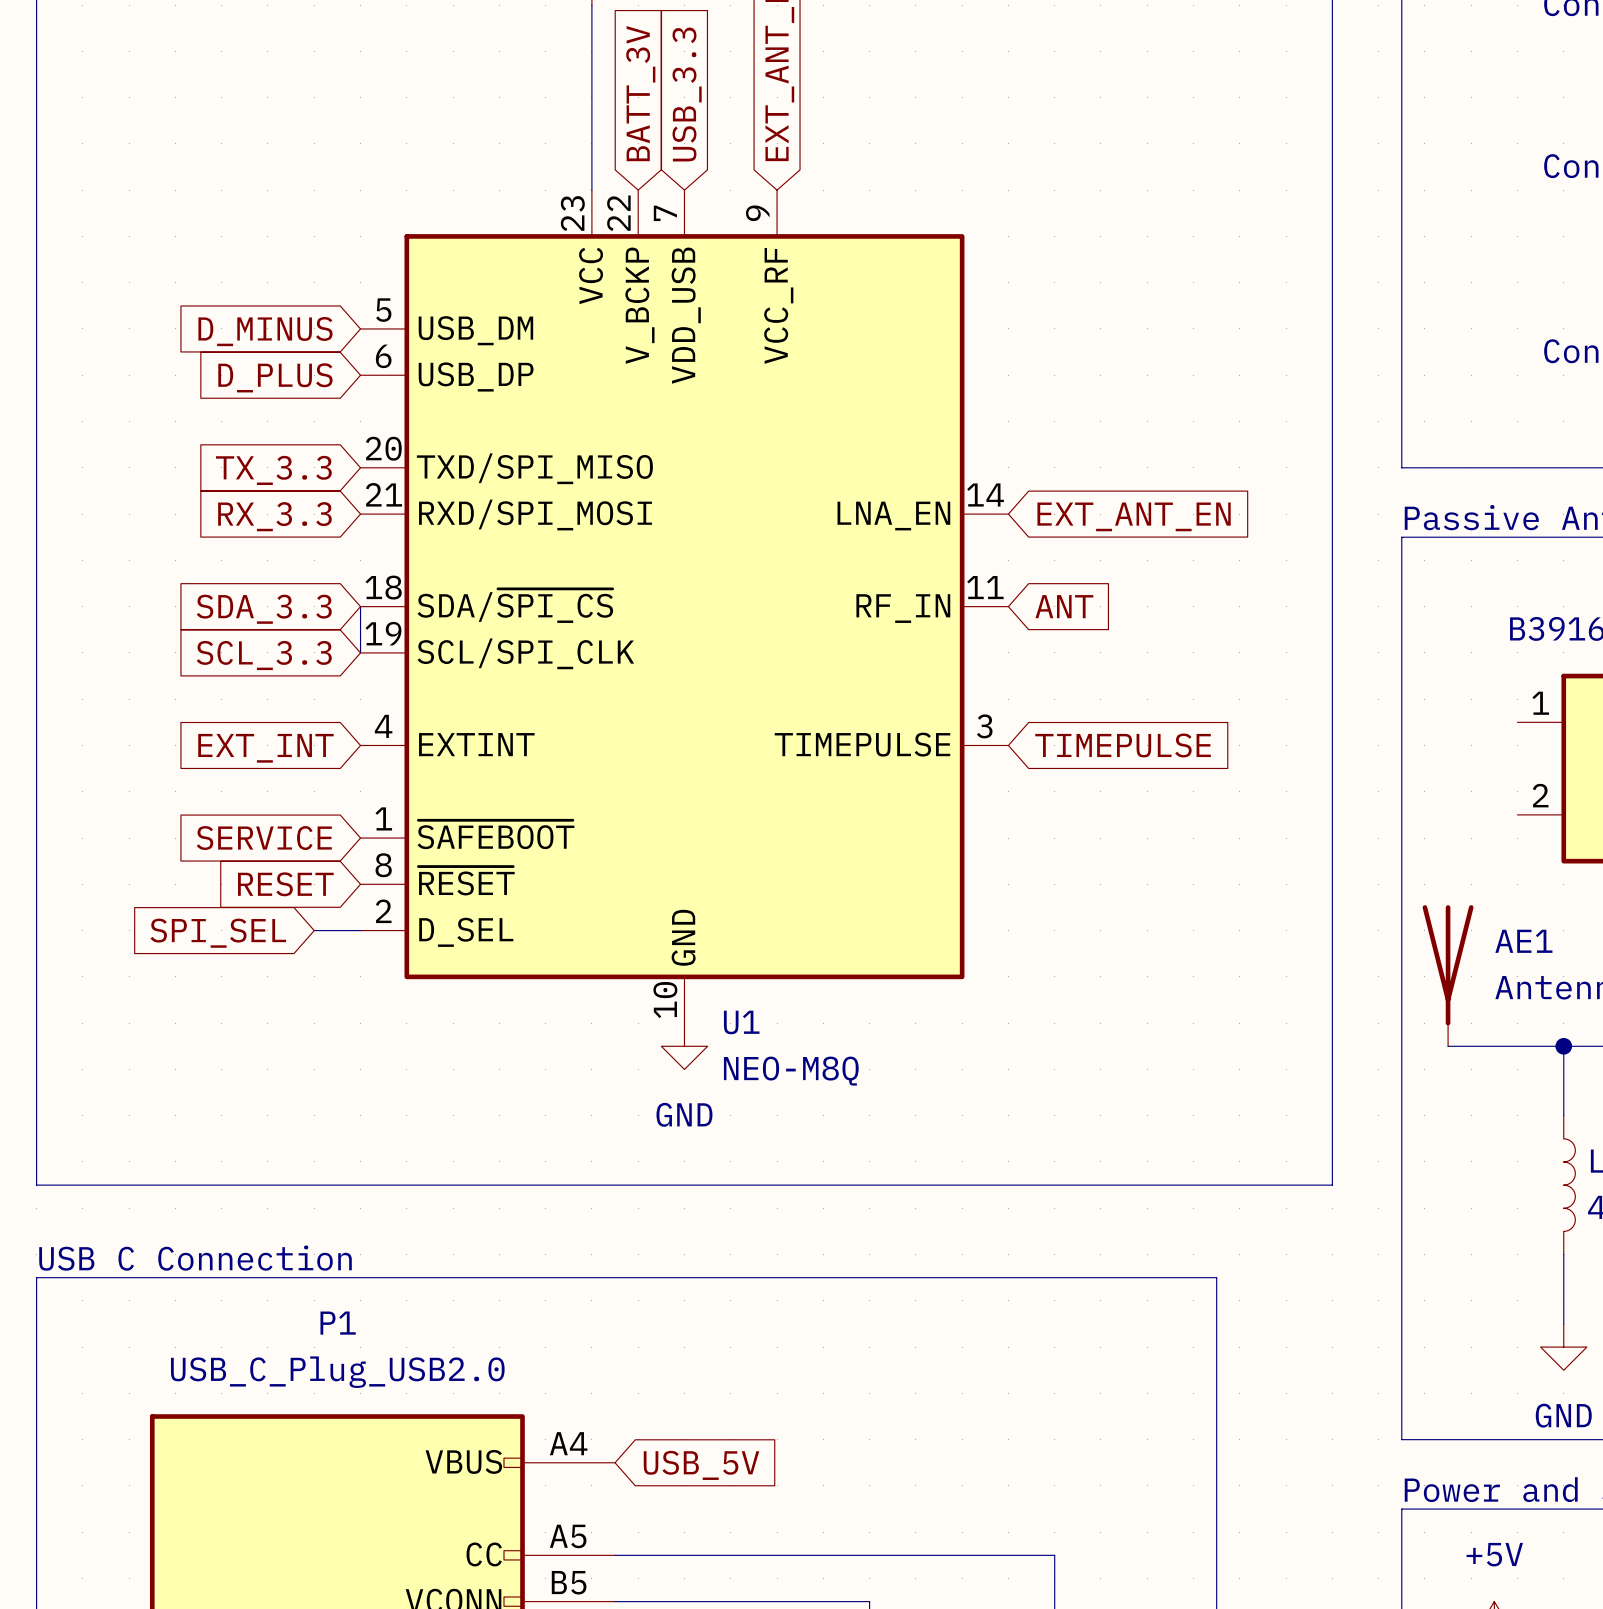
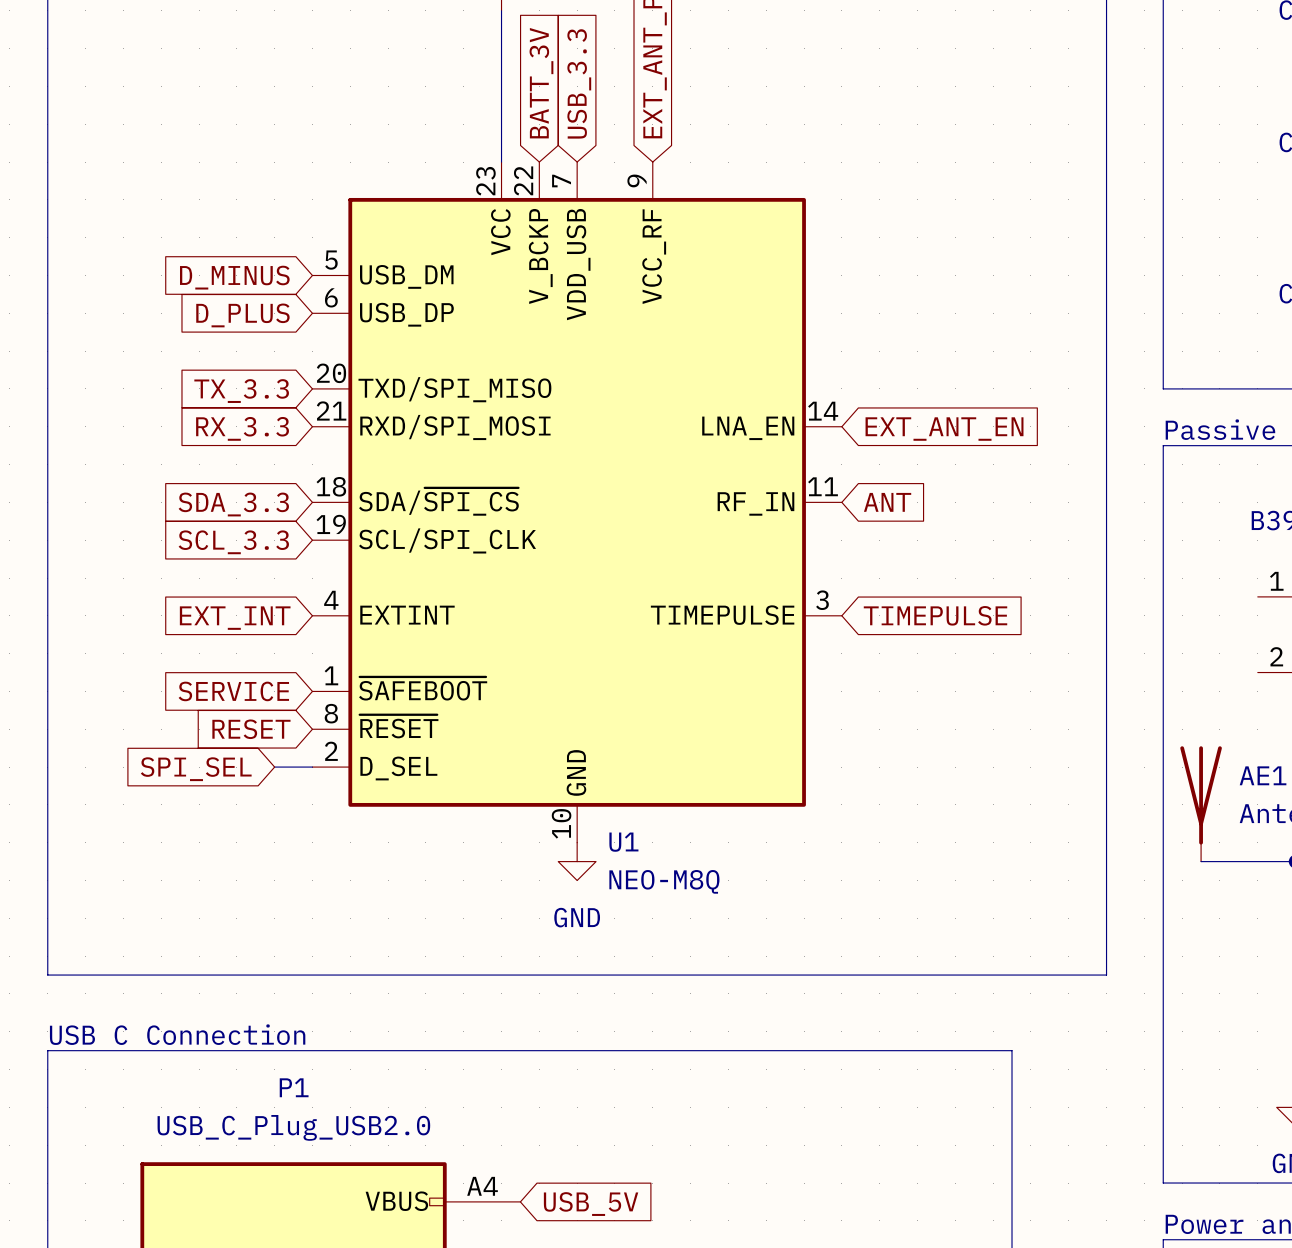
wire: (360, 606) (360, 652) -> none

